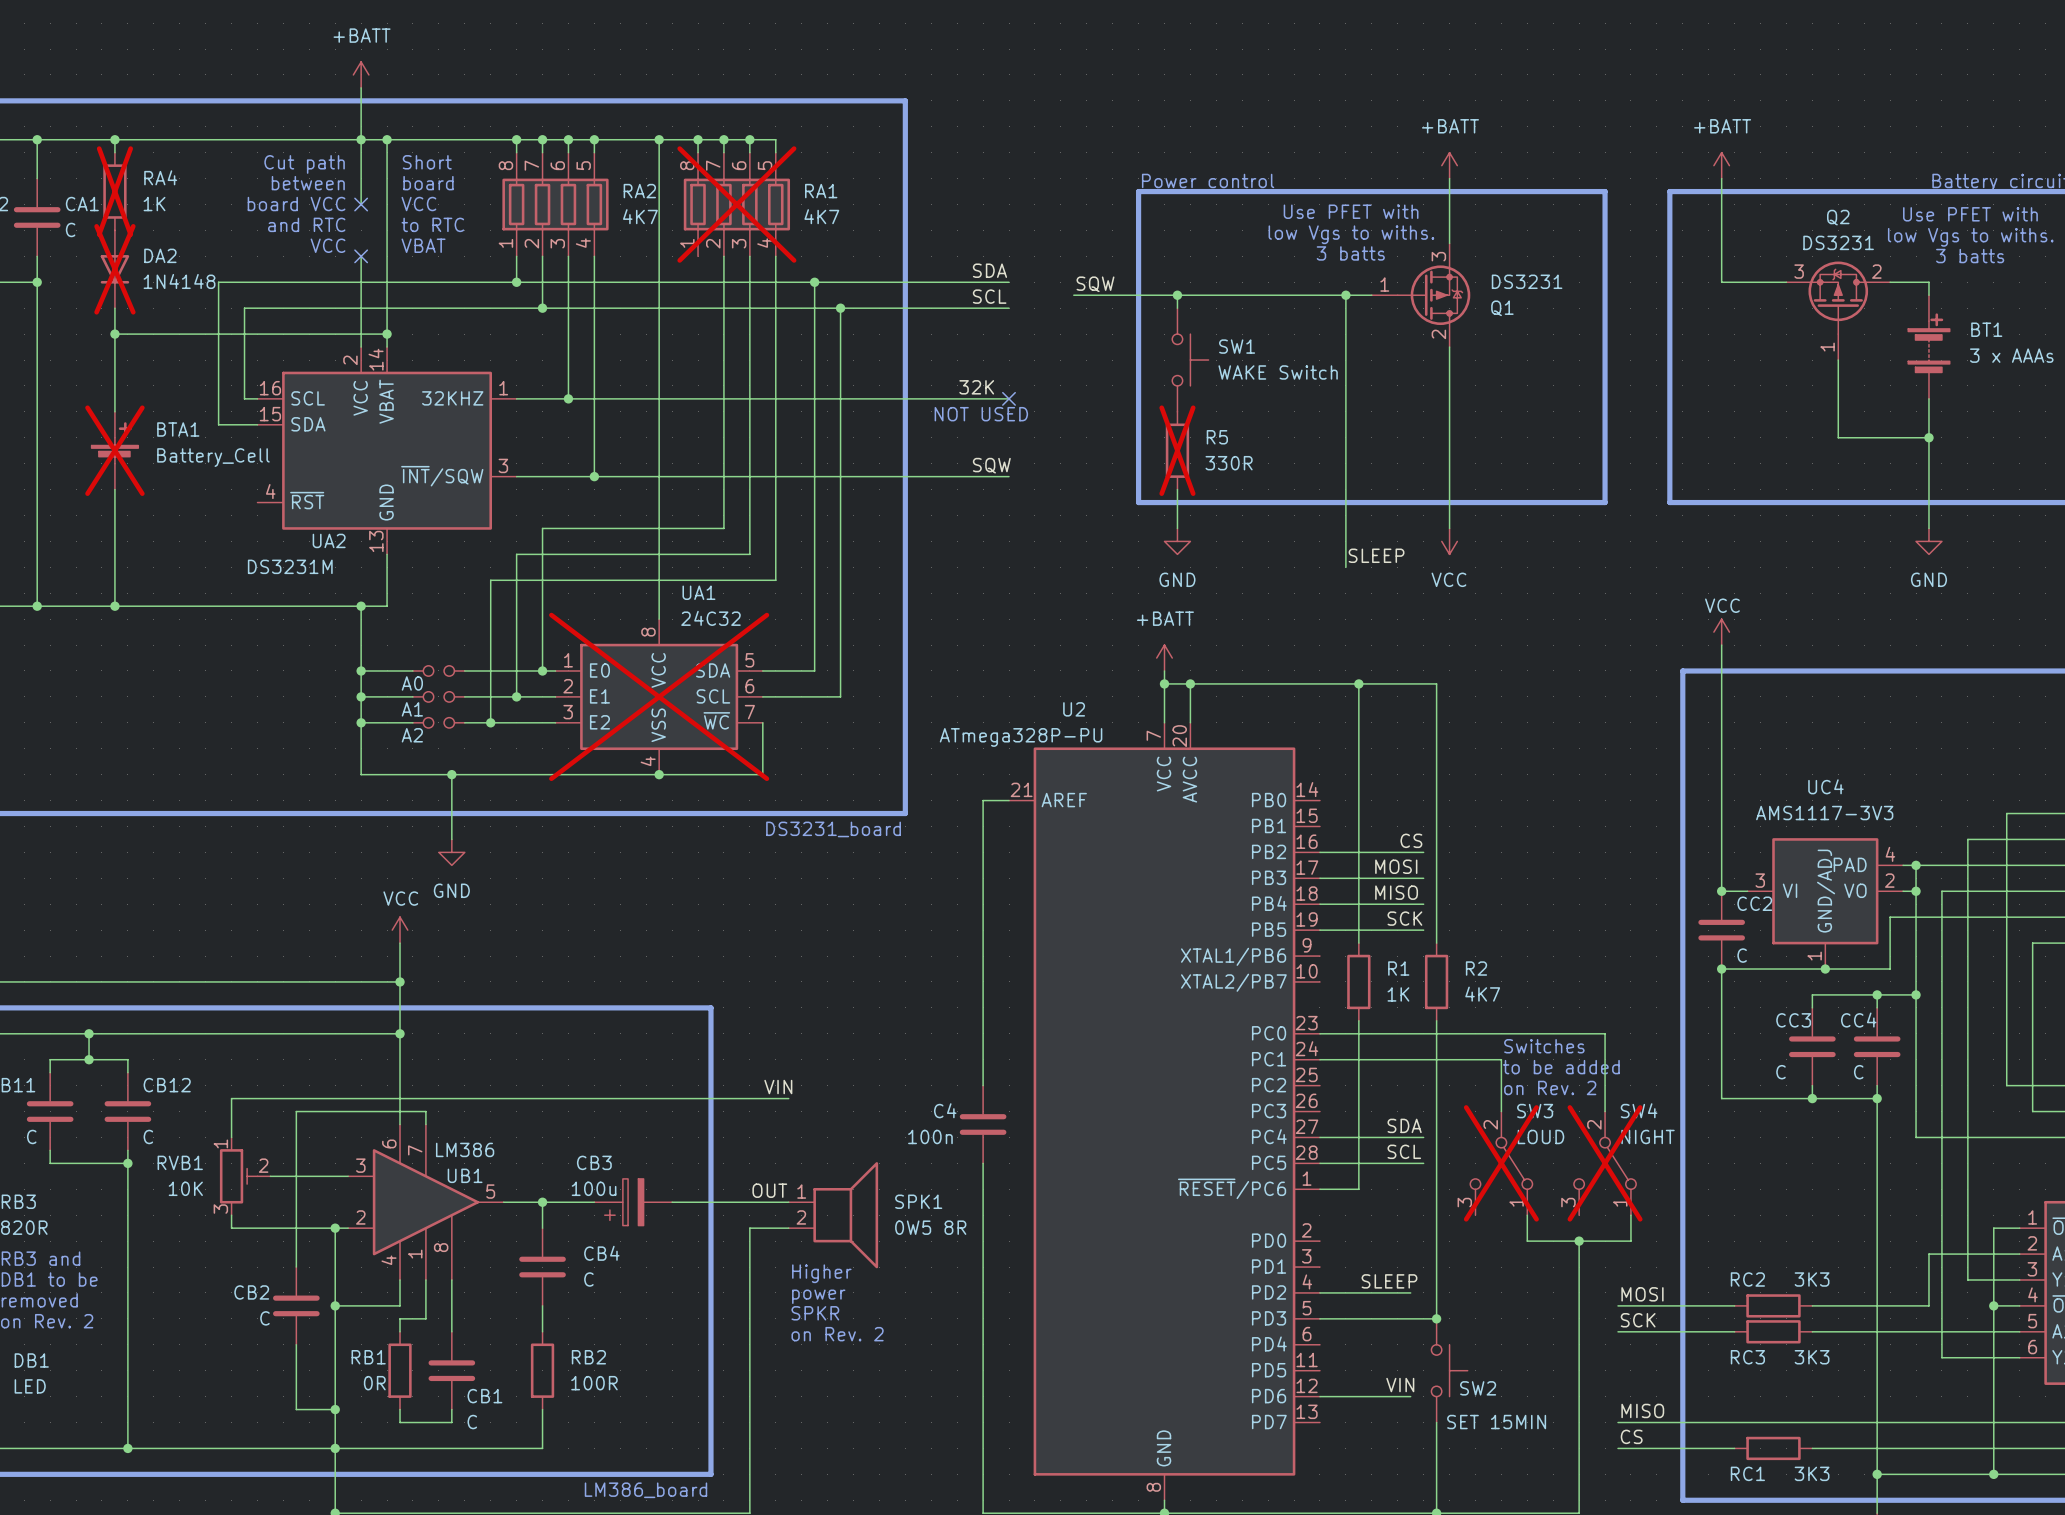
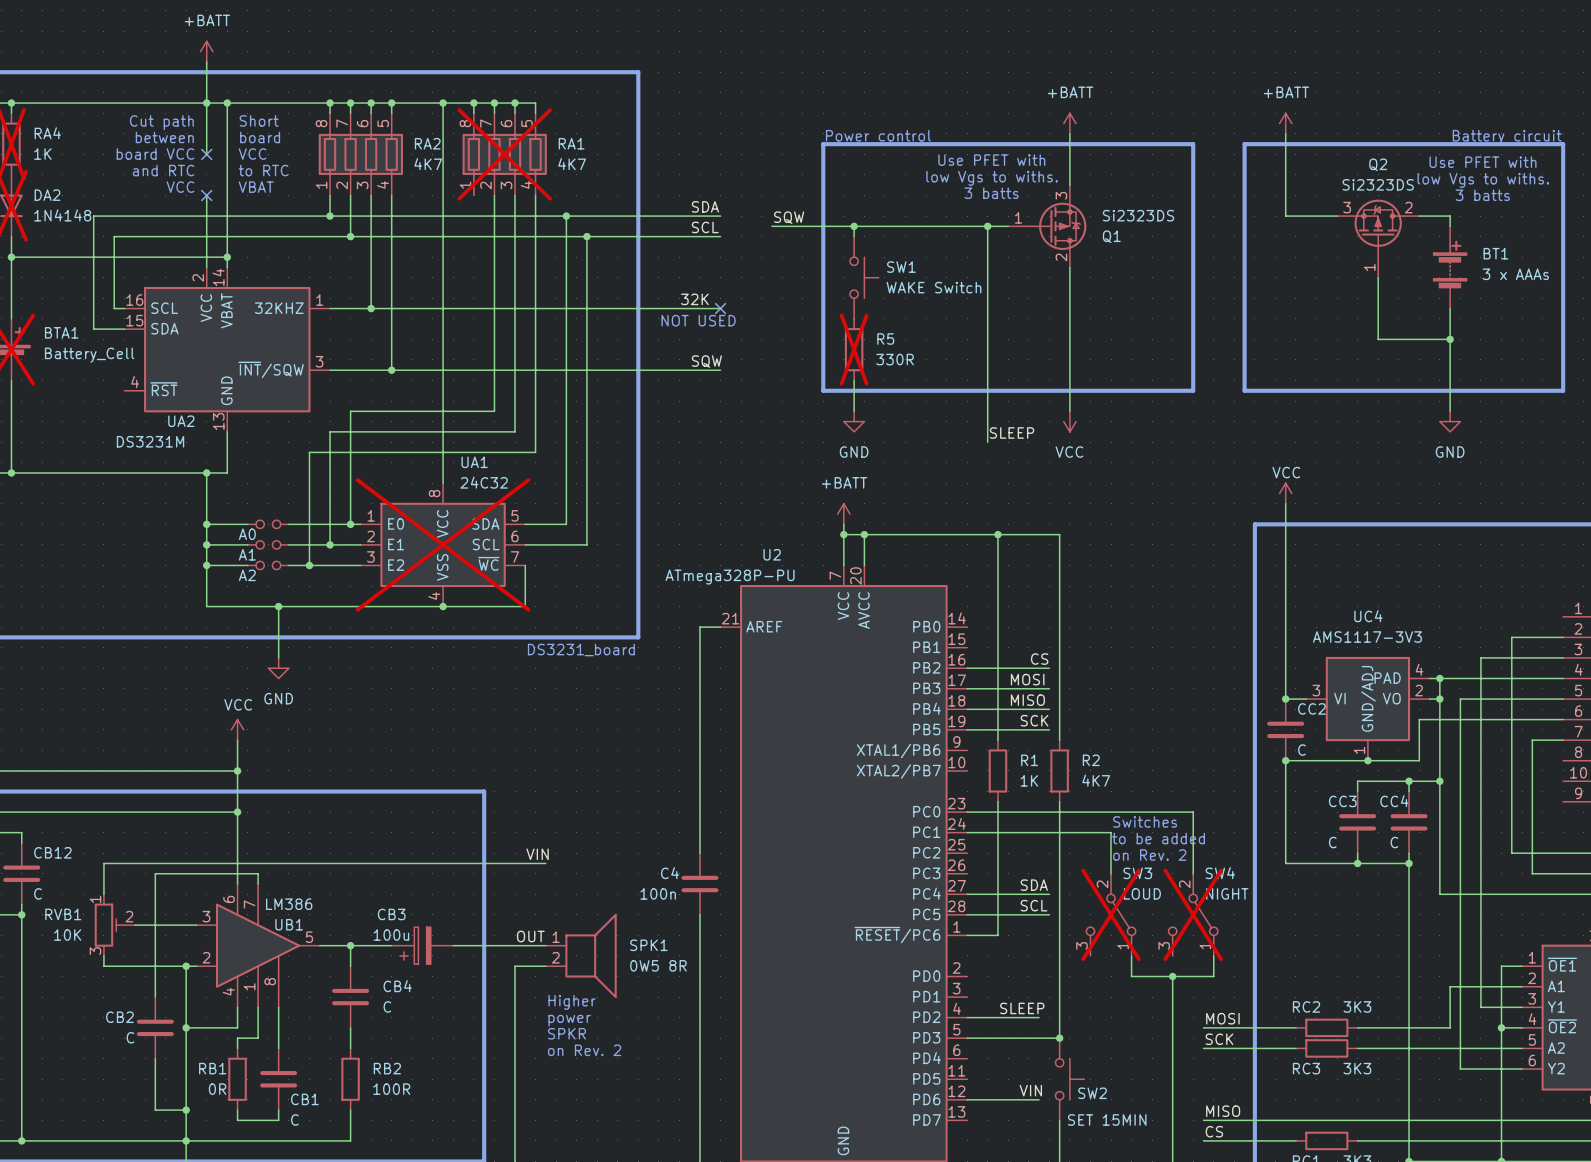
Q2 value: DS3231 (1838, 242) -> Si2323DS (1378, 184)
Q1 value: DS3231 (1527, 281) -> Si2323DS (1138, 215)

